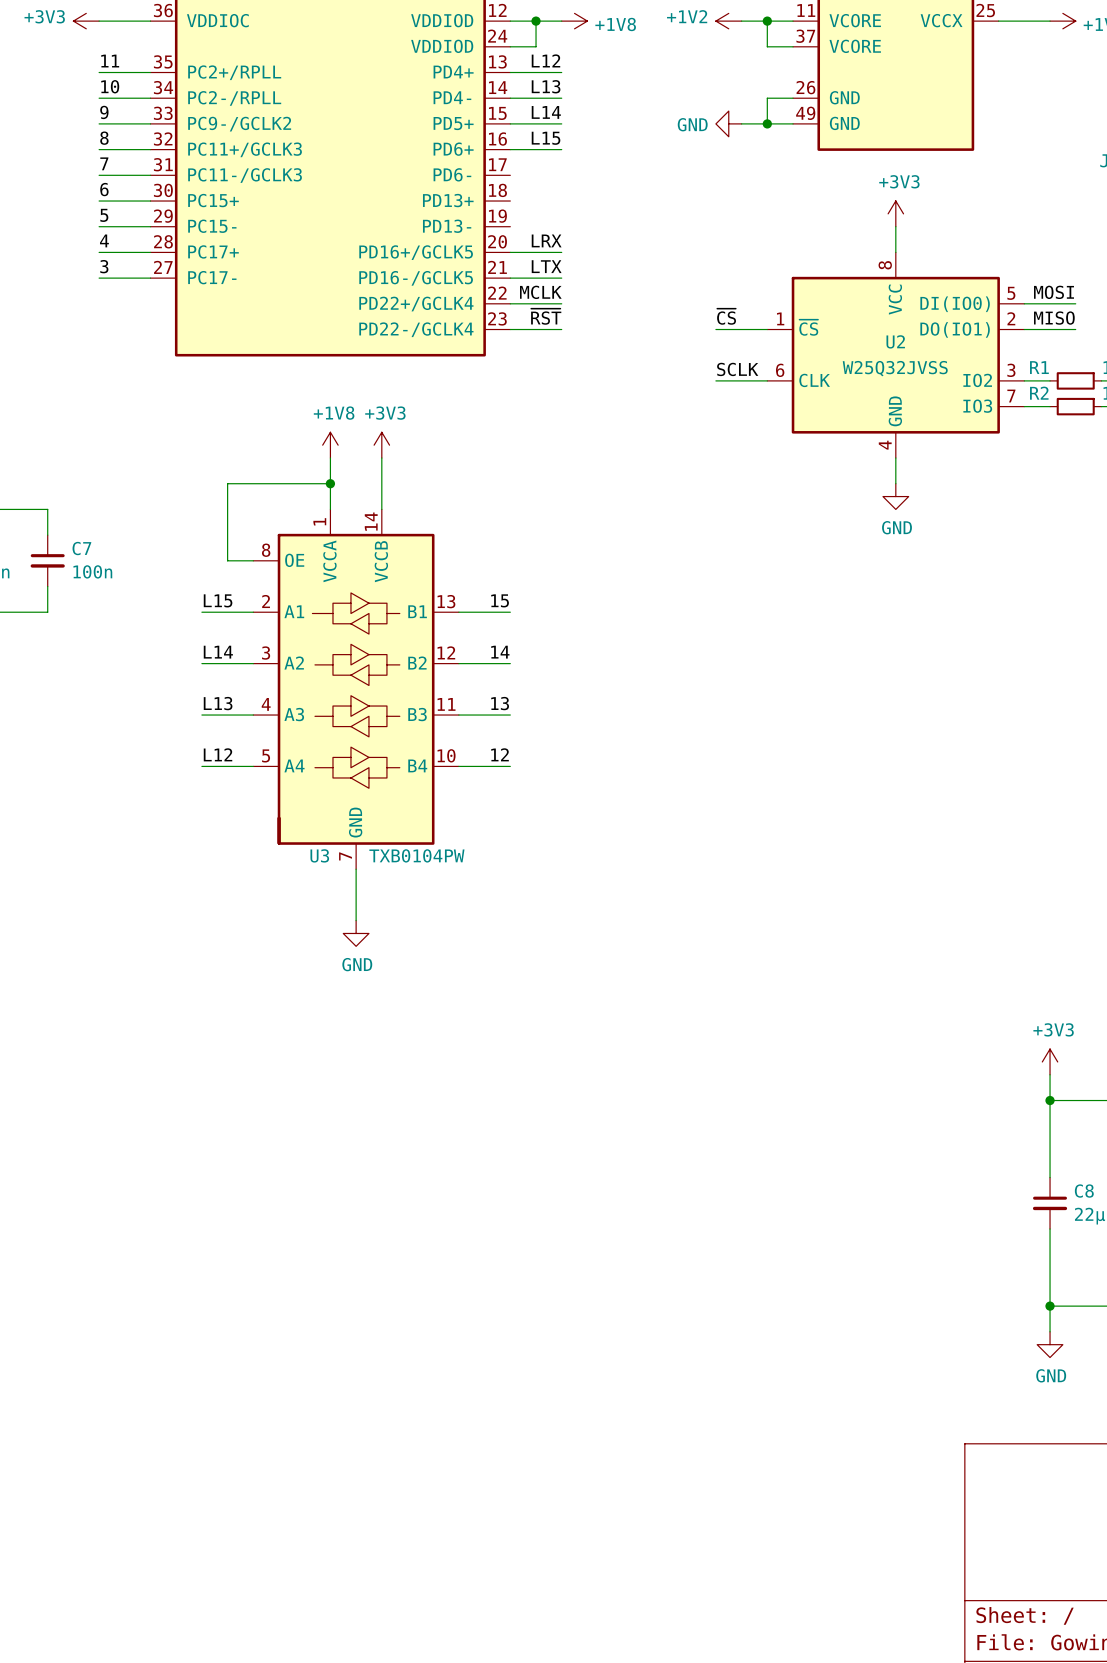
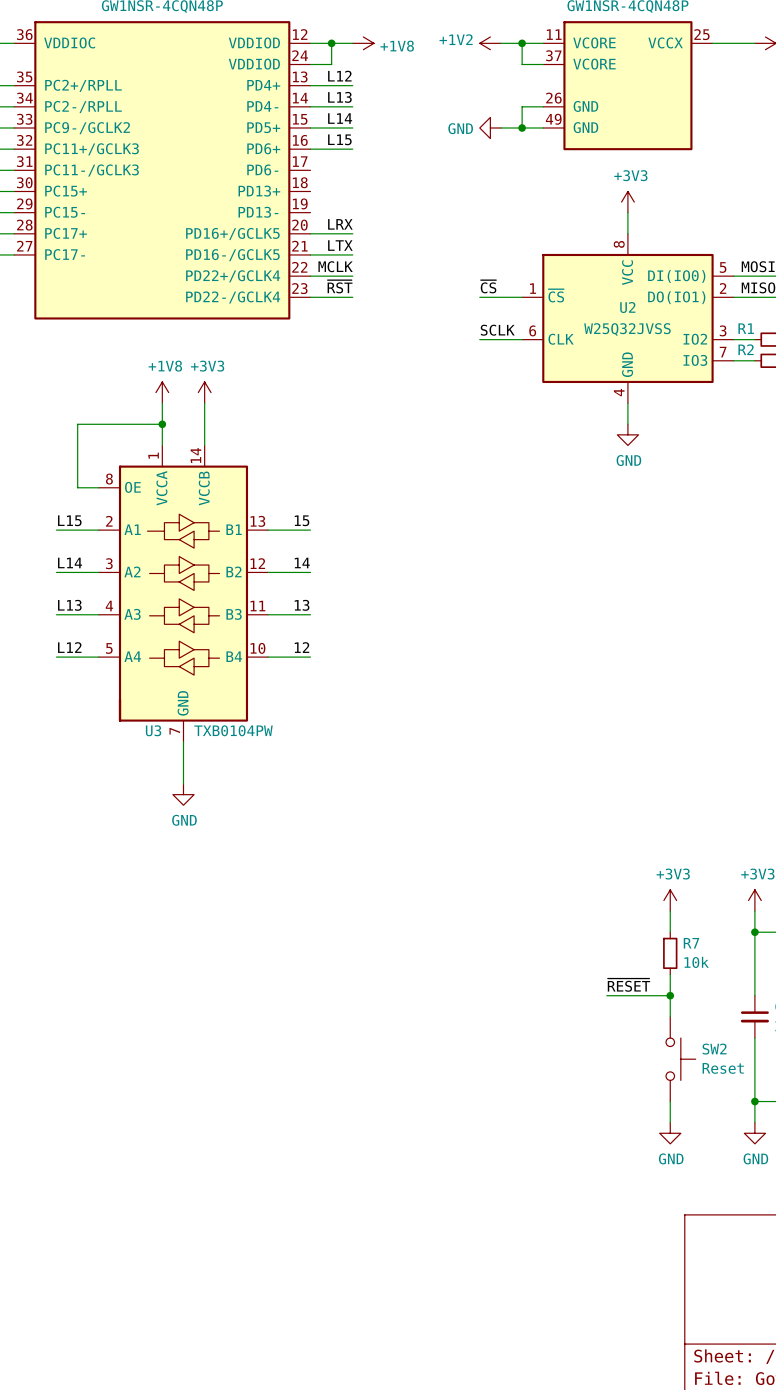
power symbol: none -> +3V3 (670, 900)
wire: none -> (670, 911) (670, 932)
R7: none -> 10k (670, 953)
wire: none -> (670, 974) (670, 1016)
label: none -> ~{RESET} (628, 985)
wire: none -> (606, 995) (670, 995)
junction: none -> (670, 995)
SW2: none -> Reset (680, 1059)
wire: none -> (670, 1101) (670, 1122)
power symbol: none -> GND (670, 1133)

